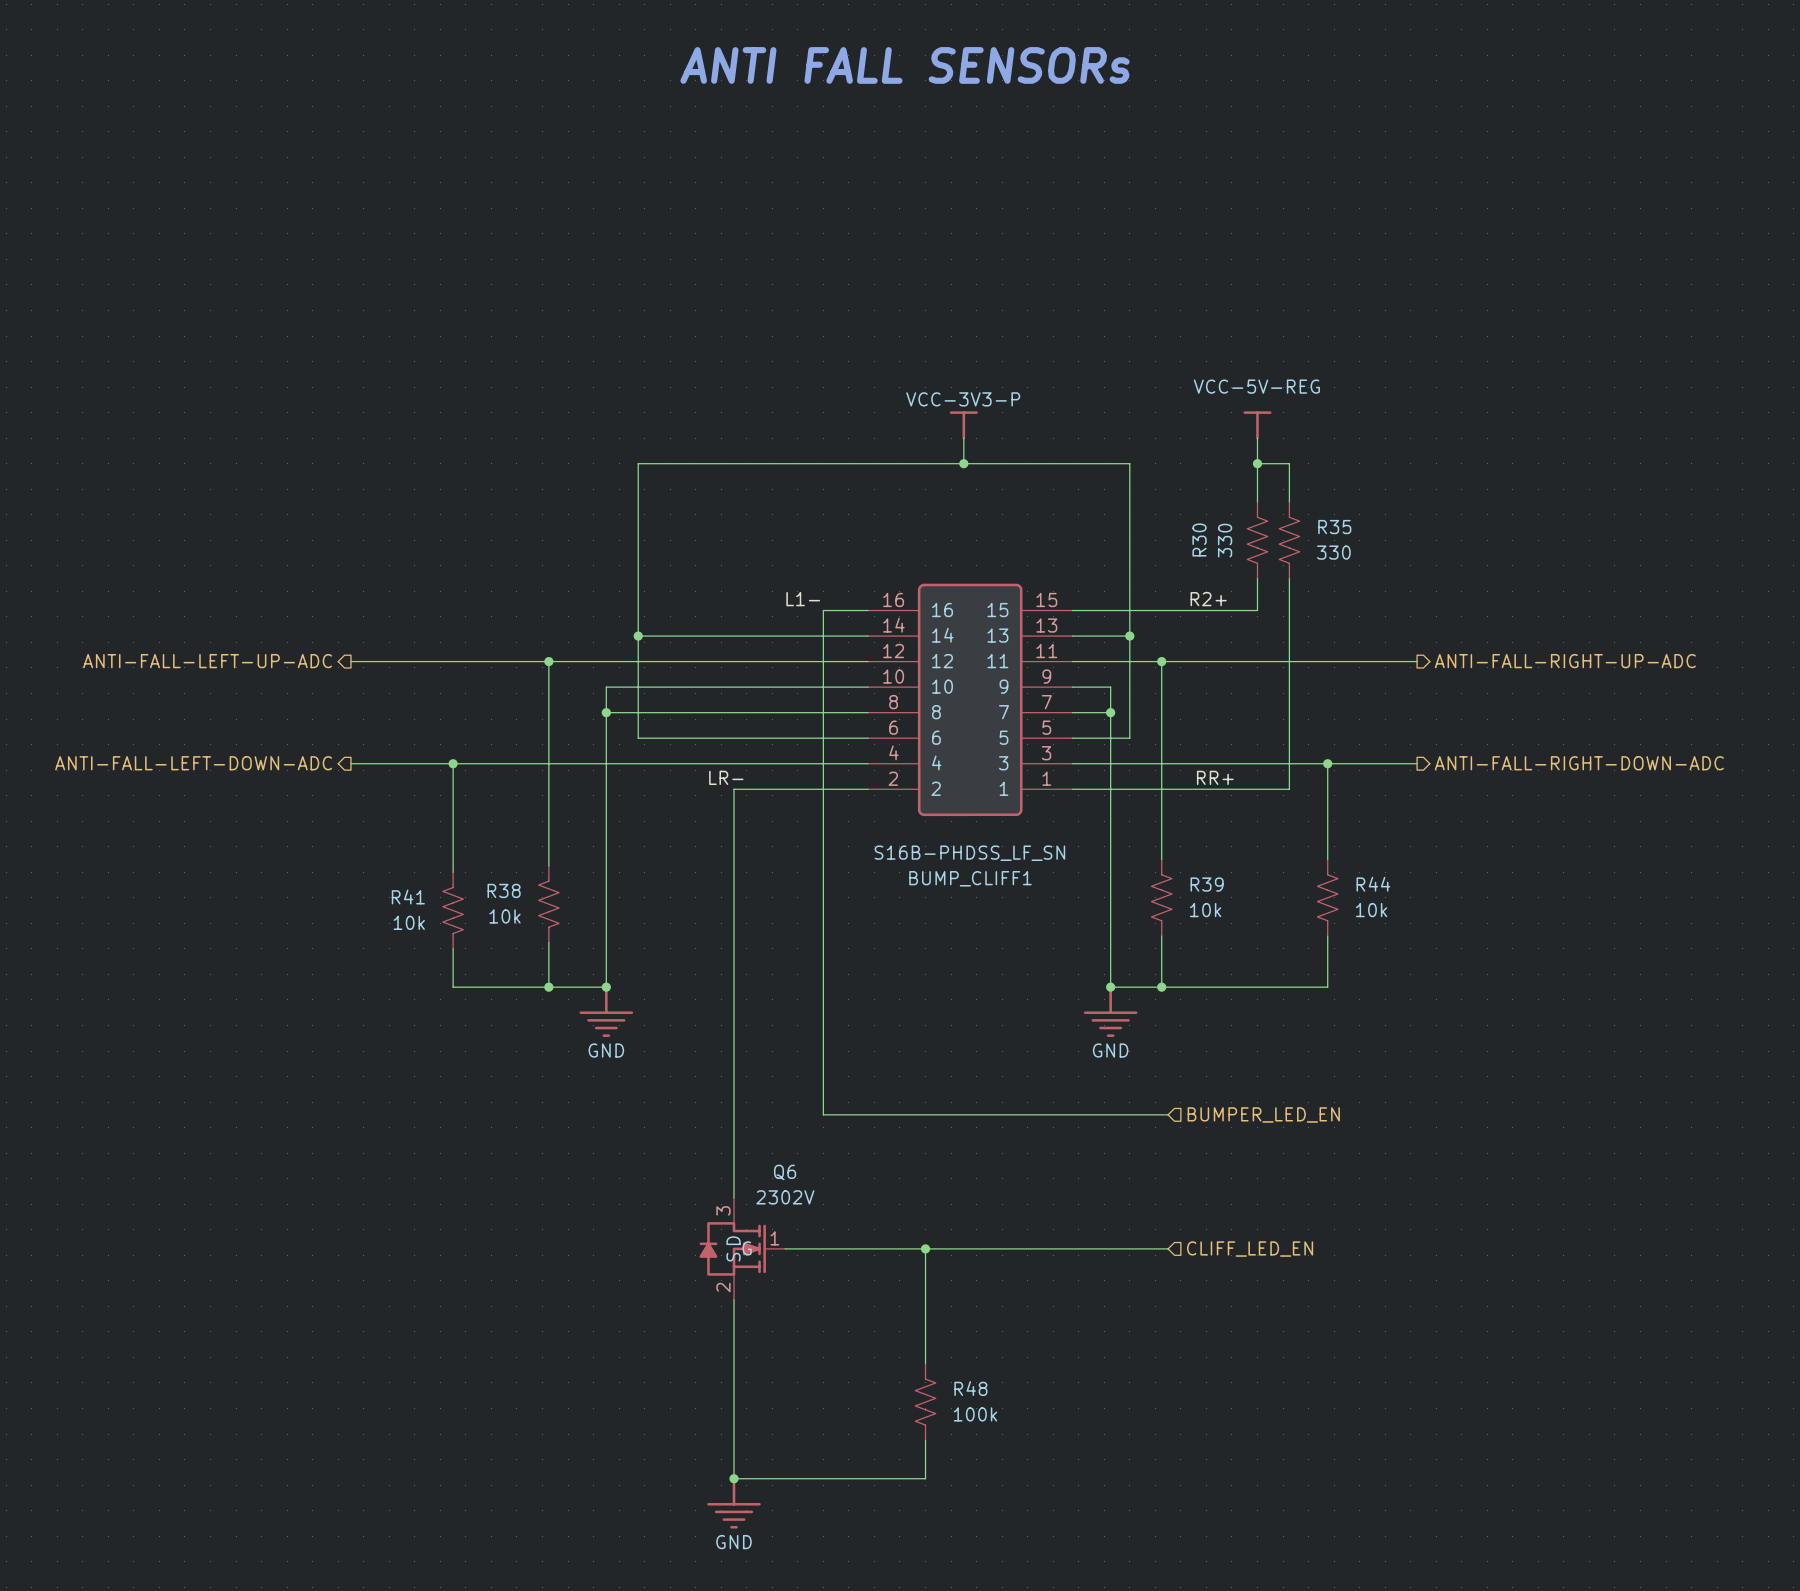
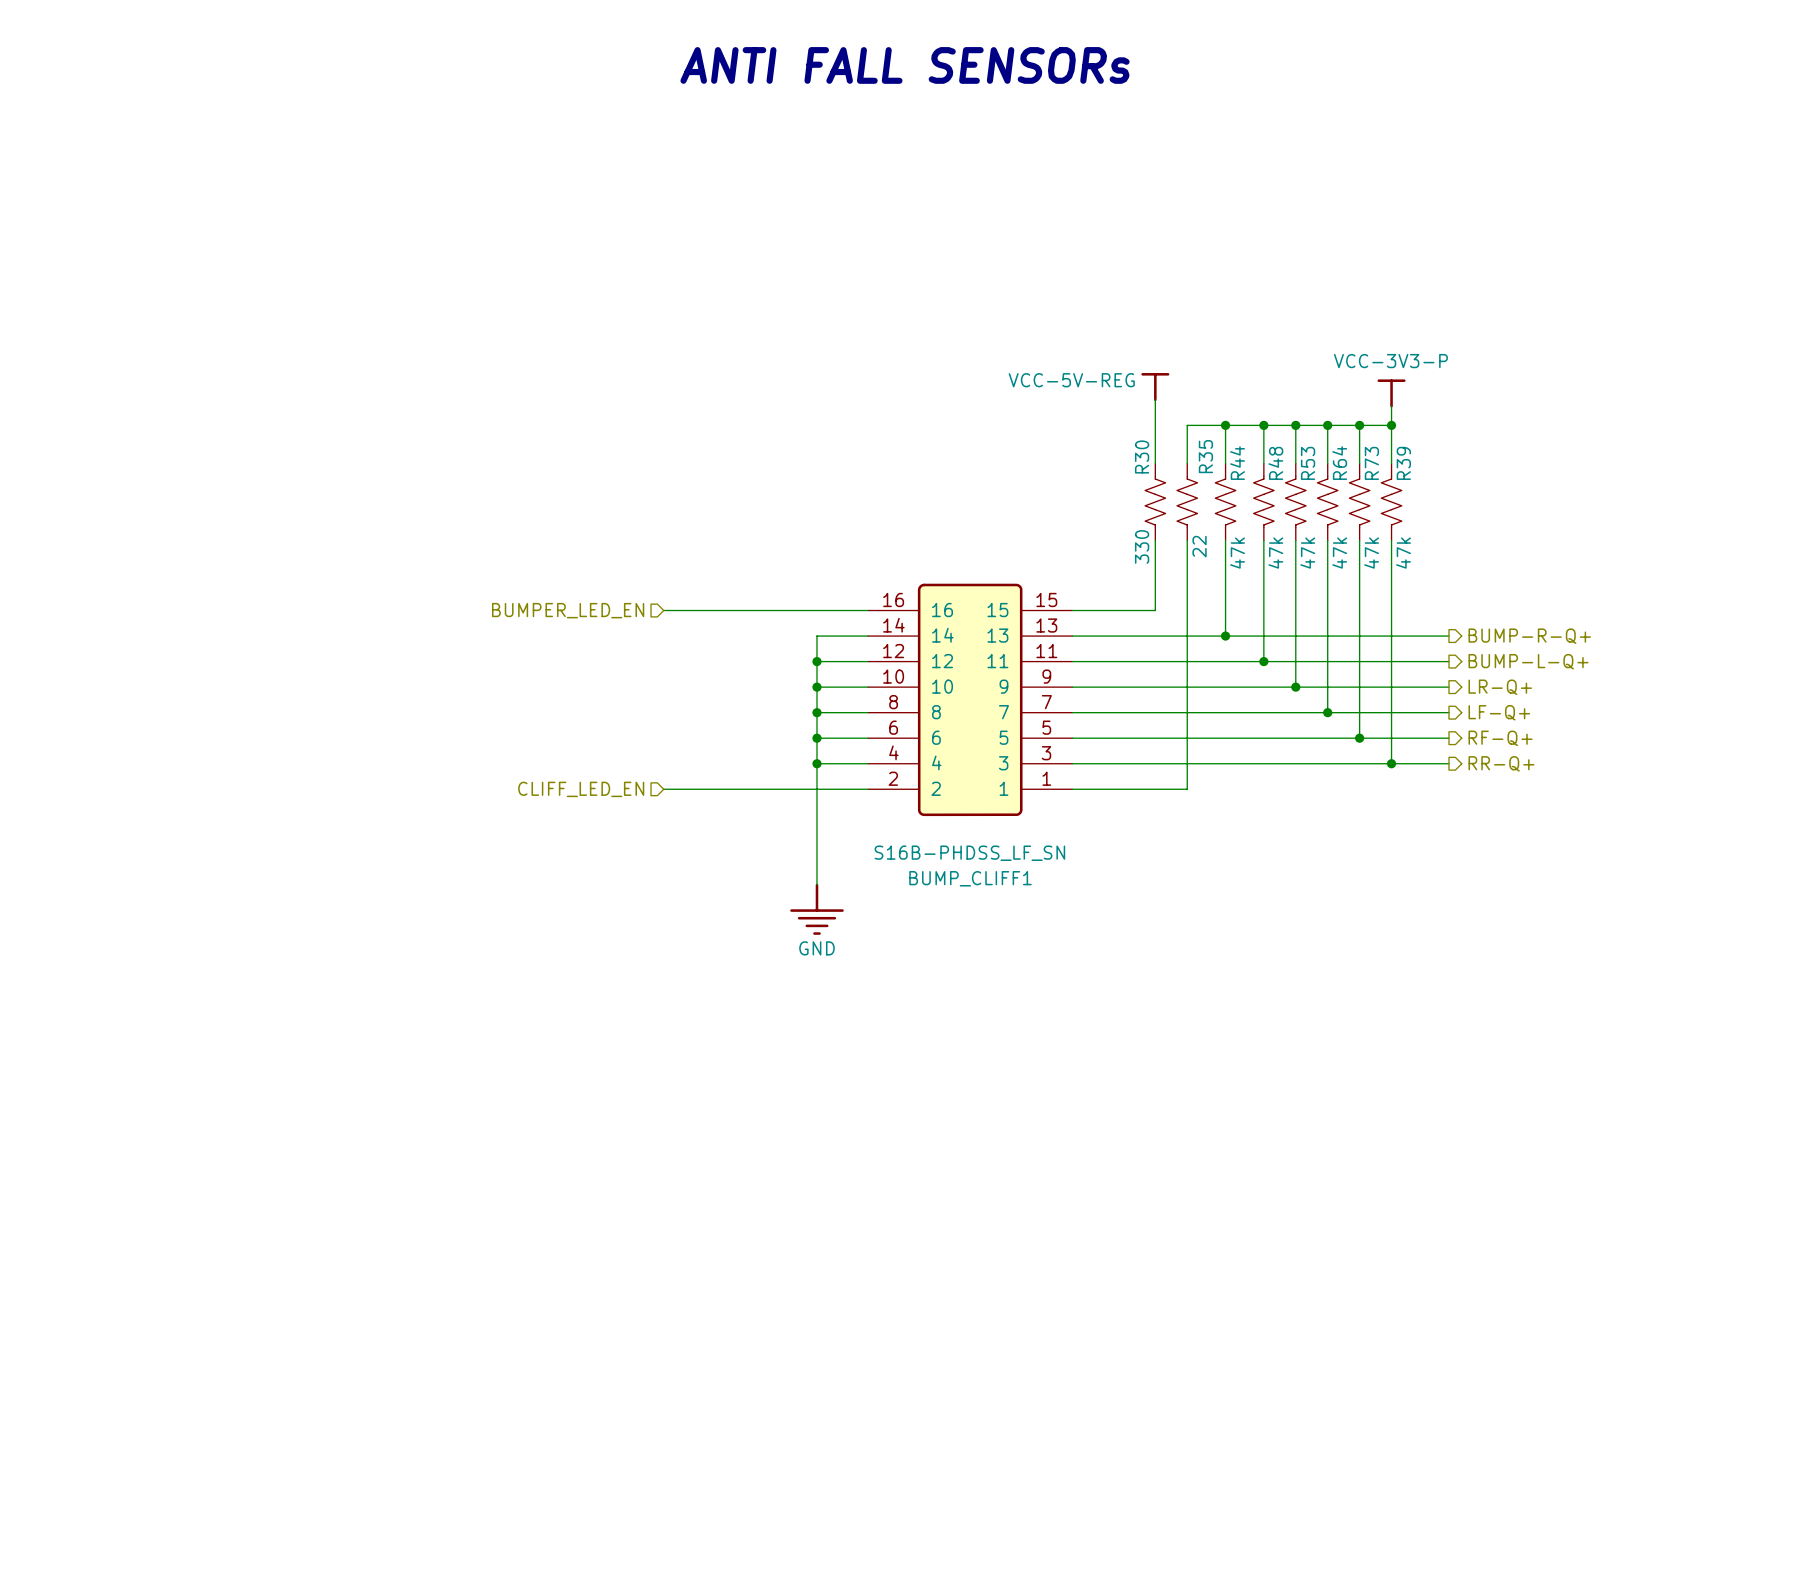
power symbol text position: VCC-5V-REG (1256, 386) -> VCC-5V-REG (1071, 380)
power symbol: none -> VCC-3V3-P (1391, 393)
wire: none -> (1391, 406) (1391, 463)
power symbol: VCC-3V3-P (963, 425) -> none
wire: none -> (1225, 425) (1225, 463)
junction: none -> (1225, 425)
power symbol position: VCC-5V-REG (1257, 425) -> VCC-5V-REG (1155, 387)
wire: none -> (1263, 425) (1263, 463)
junction: none -> (1263, 425)
wire: none -> (1295, 425) (1295, 463)
junction: none -> (1295, 425)
wire: none -> (1327, 425) (1327, 463)
junction: none -> (1327, 425)
wire: none -> (1359, 425) (1359, 463)
junction: none -> (1359, 425)
wire: none -> (1391, 425) (1187, 425) (1187, 463)
junction: none -> (1391, 425)
wire: (963, 438) (963, 463) -> none
wire: (1257, 438) (1257, 501) -> (1155, 399) (1155, 463)
junction: (963, 463) -> none
wire: (1257, 463) (1289, 463) (1289, 501) -> none
junction: (1257, 463) -> none
R53: none -> 47k (1295, 501)
R64: none -> 47k (1327, 501)
R73: none -> 47k (1359, 501)
R35 name rotation: 0° (1334, 527) -> 90° counterclockwise (1205, 456)
R35 name position: R35 (1334, 527) -> R35 (1205, 456)
R30 name position: R30 (1199, 539) -> R30 (1142, 457)
R30 value position: 330 (1225, 540) -> 330 (1142, 546)
R30 position: (1257, 540) -> (1155, 501)
wire: none -> (1263, 540) (1263, 661)
R35 position: (1289, 540) -> (1187, 501)
wire: none -> (1295, 540) (1295, 687)
wire: none -> (1327, 540) (1327, 712)
wire: none -> (1391, 540) (1391, 763)
R35 value: 330 (1333, 552) -> 22 (1199, 546)
wire: (1257, 578) (1257, 610) (1155, 610) -> (1155, 540) (1155, 610)
wire: (1289, 578) (1289, 789) (1187, 789) -> (1187, 540) (1187, 789)
label: L1- (803, 599) -> none
label: R2+ (1208, 599) -> none
hierarchical label: none -> BUMPER_LED_EN (568, 610)
wire: (823, 610) (823, 1114) (1168, 1114) -> (823, 610) (663, 610)
wire: (638, 636) (816, 636) -> (816, 885) (816, 636)
junction: (638, 636) -> none
wire: none -> (1129, 636) (1448, 636)
junction: (1129, 636) -> none
junction: none -> (1225, 636)
hierarchical label: none -> BUMP-R-Q+ (1529, 636)
hierarchical label: ANTI-FALL-LEFT-UP-ADC (207, 661) -> none
wire: (350, 661) (816, 661) -> none
wire: (548, 661) (548, 865) -> none
junction: (548, 661) -> none
junction: none -> (816, 661)
wire: (1161, 661) (1161, 859) -> (1359, 540) (1359, 738)
junction: (1161, 661) -> none
junction: none -> (1263, 661)
wire: none -> (1417, 661) (1448, 661)
hierarchical label: none -> BUMP-L-Q+ (1528, 661)
hierarchical label: ANTI-FALL-RIGHT-UP-ADC (1565, 661) -> none
wire: (816, 687) (606, 687) (606, 987) (453, 987) (453, 948) -> none
junction: none -> (816, 687)
wire: (1110, 687) (1110, 987) (1327, 987) (1327, 936) -> (1110, 687) (1448, 687)
junction: none -> (1295, 687)
hierarchical label: none -> LR-Q+ (1500, 687)
wire: (606, 712) (816, 712) -> none
junction: (606, 712) -> none
junction: none -> (816, 712)
wire: none -> (1110, 712) (1448, 712)
junction: (1110, 712) -> none
junction: none -> (1327, 712)
hierarchical label: none -> LF-Q+ (1499, 712)
wire: (816, 738) (638, 738) (638, 463) (1129, 463) (1129, 738) -> (1448, 738) (1129, 738)
junction: none -> (816, 738)
junction: none -> (1359, 738)
hierarchical label: none -> RF-Q+ (1500, 738)
hierarchical label: ANTI-FALL-LEFT-DOWN-ADC (193, 763) -> none
wire: (350, 763) (816, 763) -> none
wire: (453, 763) (453, 872) -> none
junction: (453, 763) -> none
junction: none -> (816, 763)
wire: (1327, 763) (1327, 859) -> (1225, 540) (1225, 636)
junction: (1327, 763) -> none
junction: none -> (1391, 763)
wire: none -> (1417, 763) (1448, 763)
hierarchical label: none -> RR-Q+ (1501, 763)
hierarchical label: ANTI-FALL-RIGHT-DOWN-ADC (1579, 763) -> none
label: LR- (726, 777) -> none
label: RR+ (1215, 777) -> none
hierarchical label: none -> CLIFF_LED_EN (581, 789)
wire: (734, 789) (734, 1197) -> (734, 789) (663, 789)
R39 name position: R39 (1207, 884) -> R39 (1403, 463)
R44 name position: R44 (1373, 884) -> R44 (1237, 463)
R39 flip: as is (1161, 897) -> left-right (1391, 501)
R39 position: (1161, 897) -> (1391, 501)
R44 flip: as is (1327, 897) -> left-right (1225, 501)
R44 position: (1327, 897) -> (1225, 501)
R38: 10k (548, 904) -> none
power symbol: none -> GND (816, 909)
R41: 10k (453, 910) -> none
R39 value: 10k (1205, 910) -> 47k (1403, 553)
R44 value: 10k (1371, 910) -> 47k (1237, 553)
wire: (1161, 936) (1161, 987) -> none
wire: (548, 942) (548, 987) -> none
junction: (548, 987) -> none
junction: (606, 987) -> none
junction: (1110, 987) -> none
junction: (1161, 987) -> none
power symbol: GND (606, 1011) -> none
power symbol: GND (1110, 1011) -> none
hierarchical label: BUMPER_LED_EN (1263, 1114) -> none
Q6: 2302V (742, 1248) -> none
wire: (785, 1248) (1168, 1248) -> none
wire: (925, 1248) (925, 1363) -> none
junction: (925, 1248) -> none
hierarchical label: CLIFF_LED_EN (1250, 1249) -> none
wire: (734, 1299) (734, 1478) (925, 1478) (925, 1440) -> none
R48 name position: R48 (970, 1388) -> R48 (1275, 463)
R48 flip: as is (925, 1402) -> left-right (1263, 501)
R48 position: (925, 1402) -> (1263, 501)
R48 value: 100k (975, 1414) -> 47k (1275, 553)
junction: (734, 1478) -> none
power symbol: GND (734, 1502) -> none

